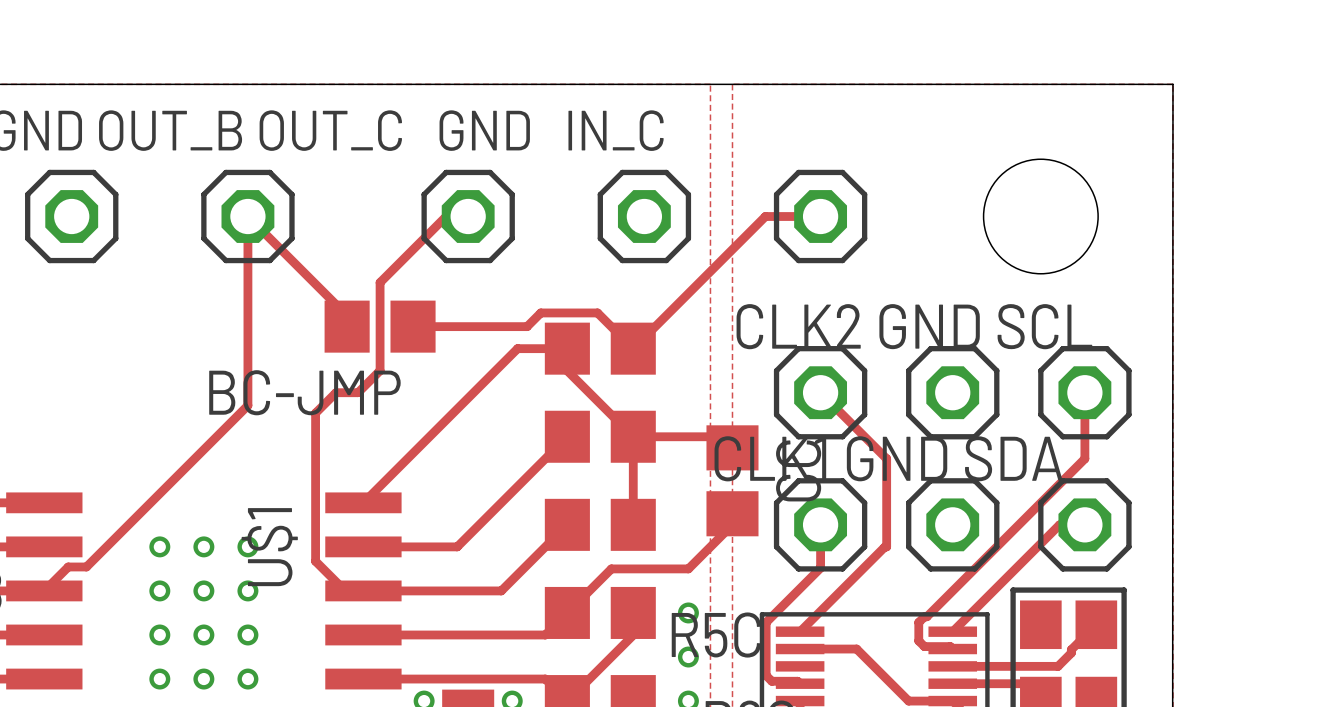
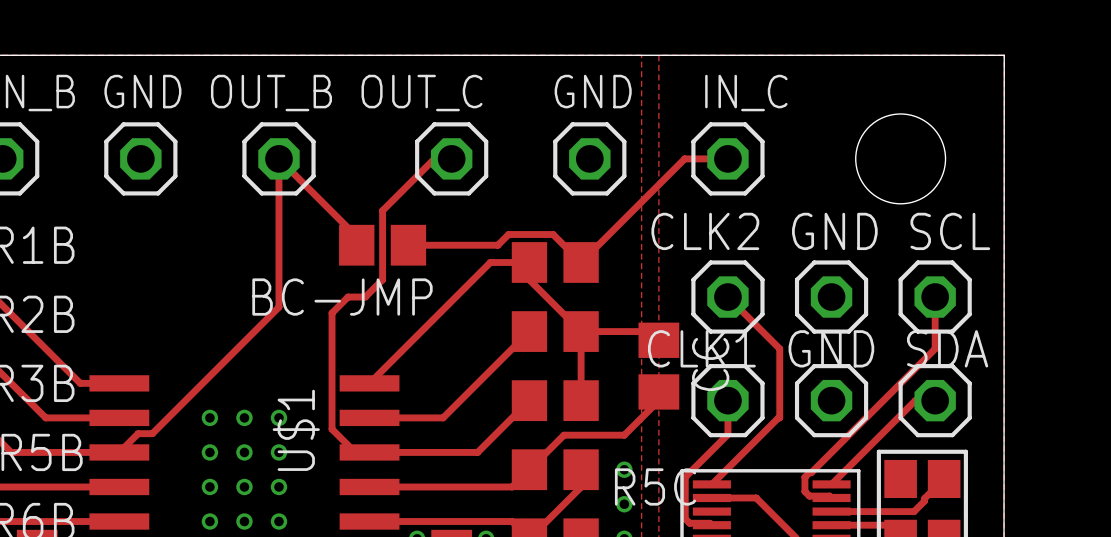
text position: CLK2 GND SCL (914, 326) -> CLK2 GND SCL (820, 231)

